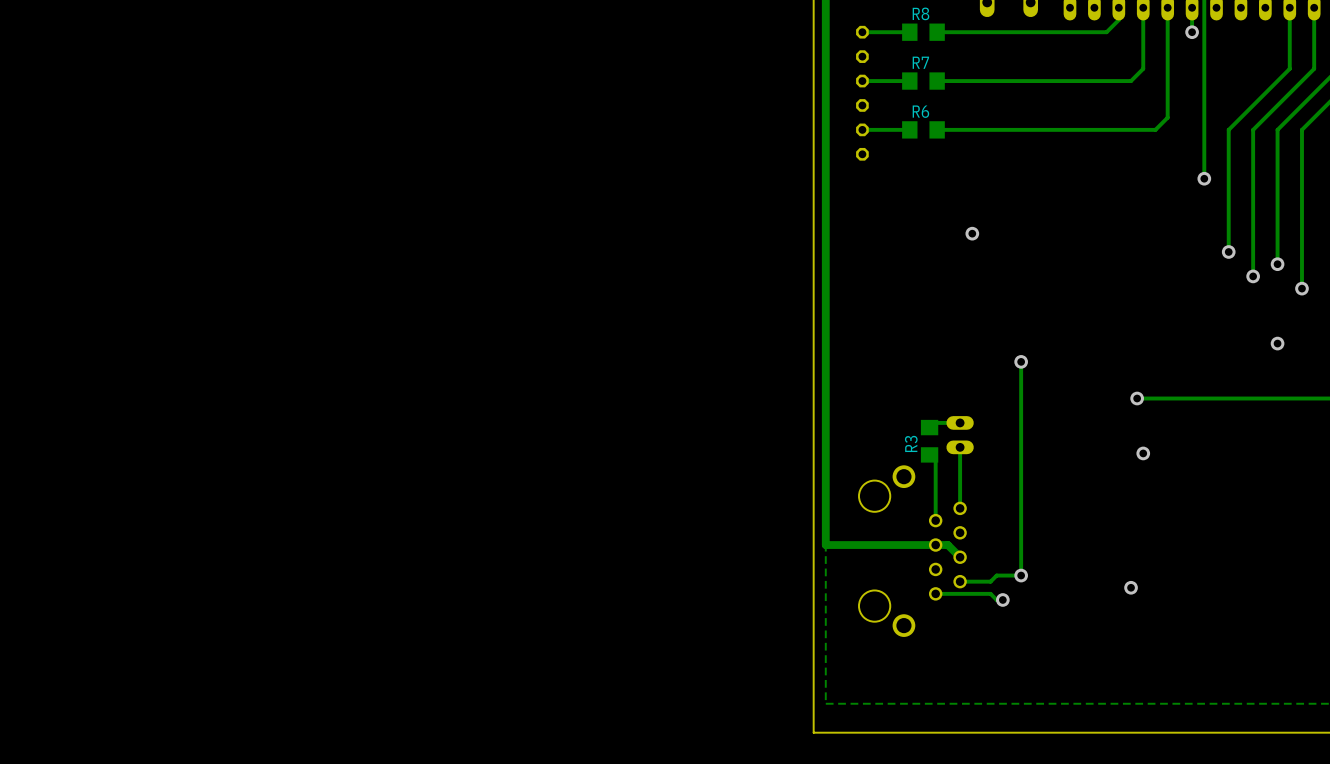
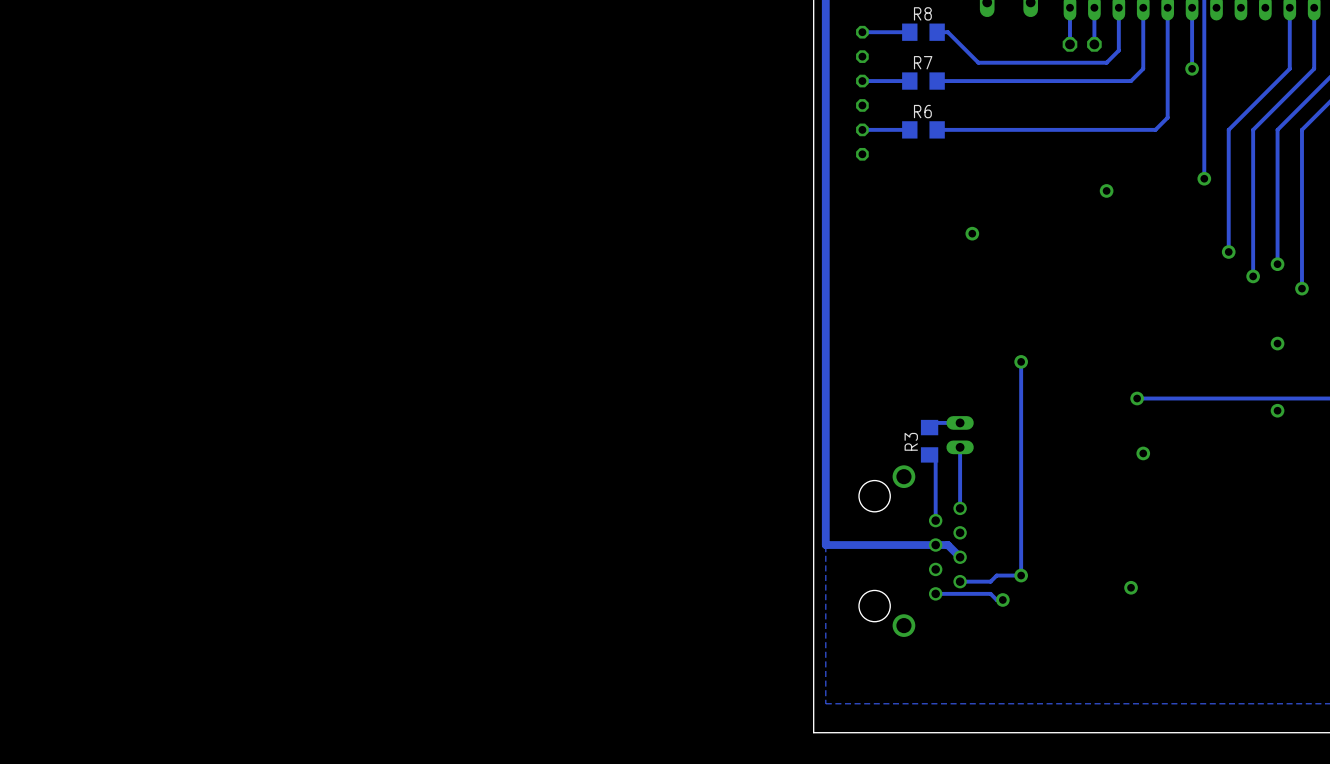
track: none -> (1069, 7) (1069, 44)
track: none -> (1094, 7) (1094, 44)
track: (1118, 19) (1106, 32) (947, 32) -> (1118, 19) (1118, 50) (1106, 62) (978, 62) (947, 32)
track: none -> (1192, 32) (1192, 68)
via position: (1192, 32) -> (1192, 68)
part: none -> (1069, 44)
part: none -> (1094, 44)
via: none -> (1106, 190)
via: none -> (1277, 410)

